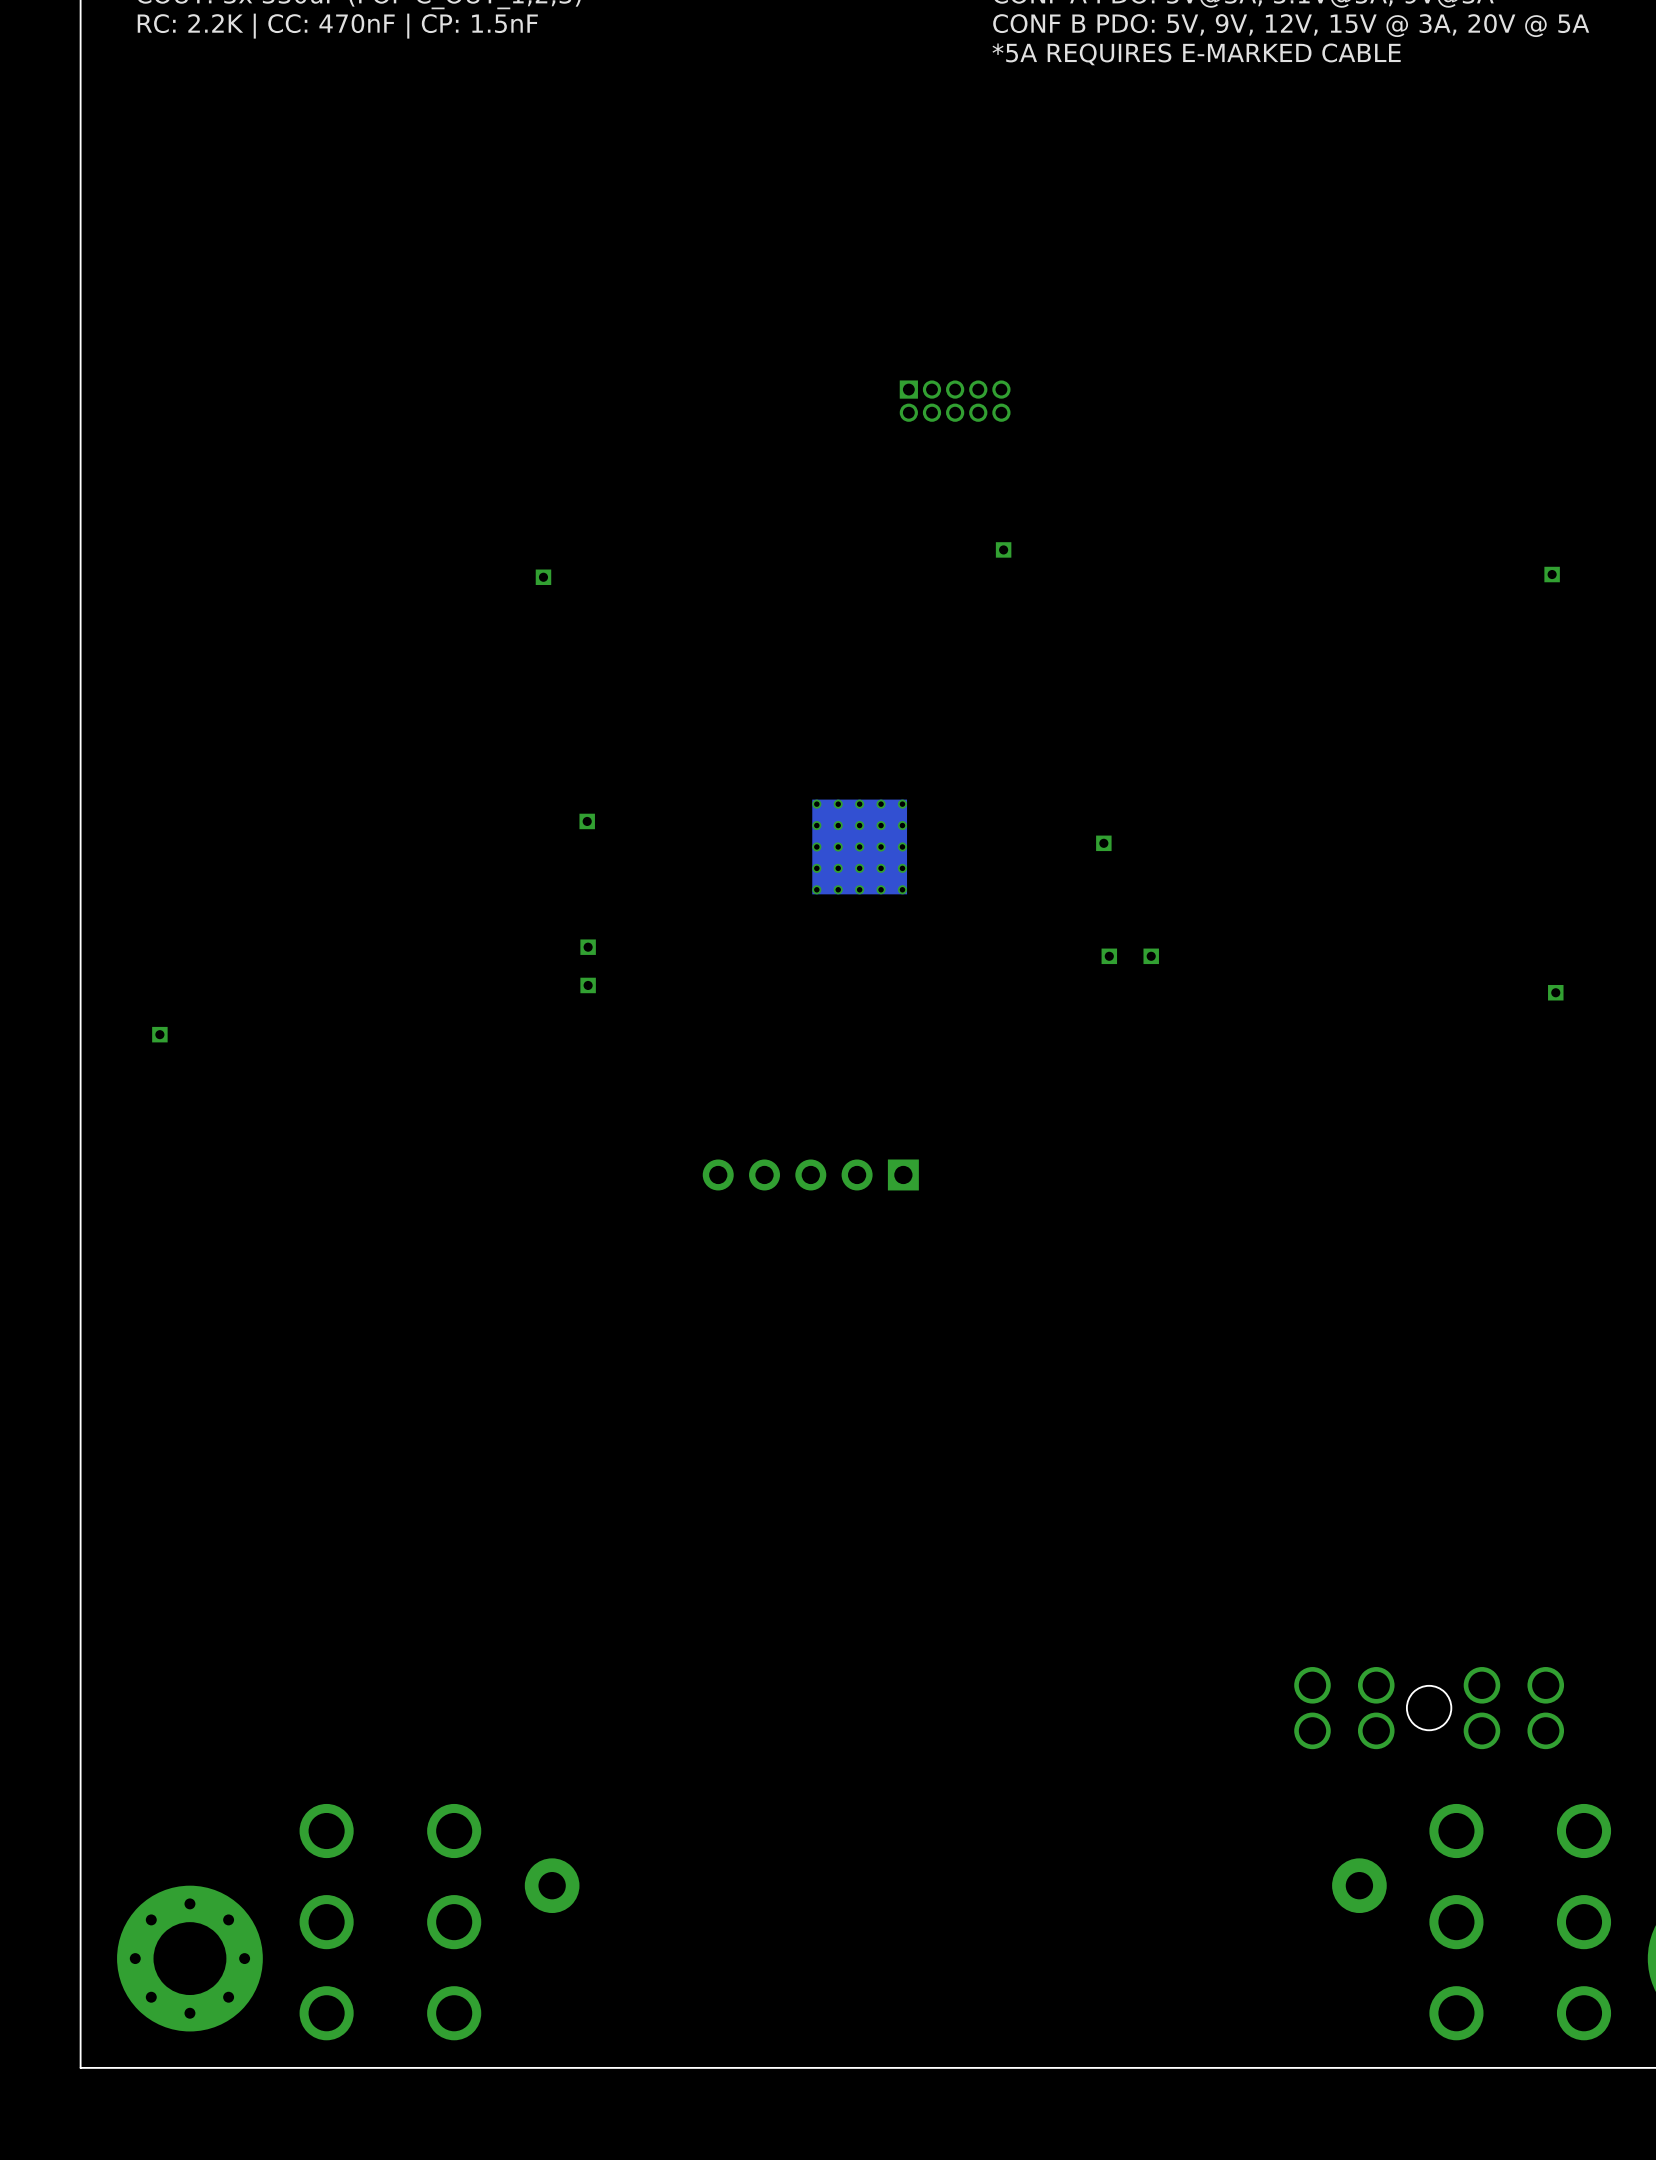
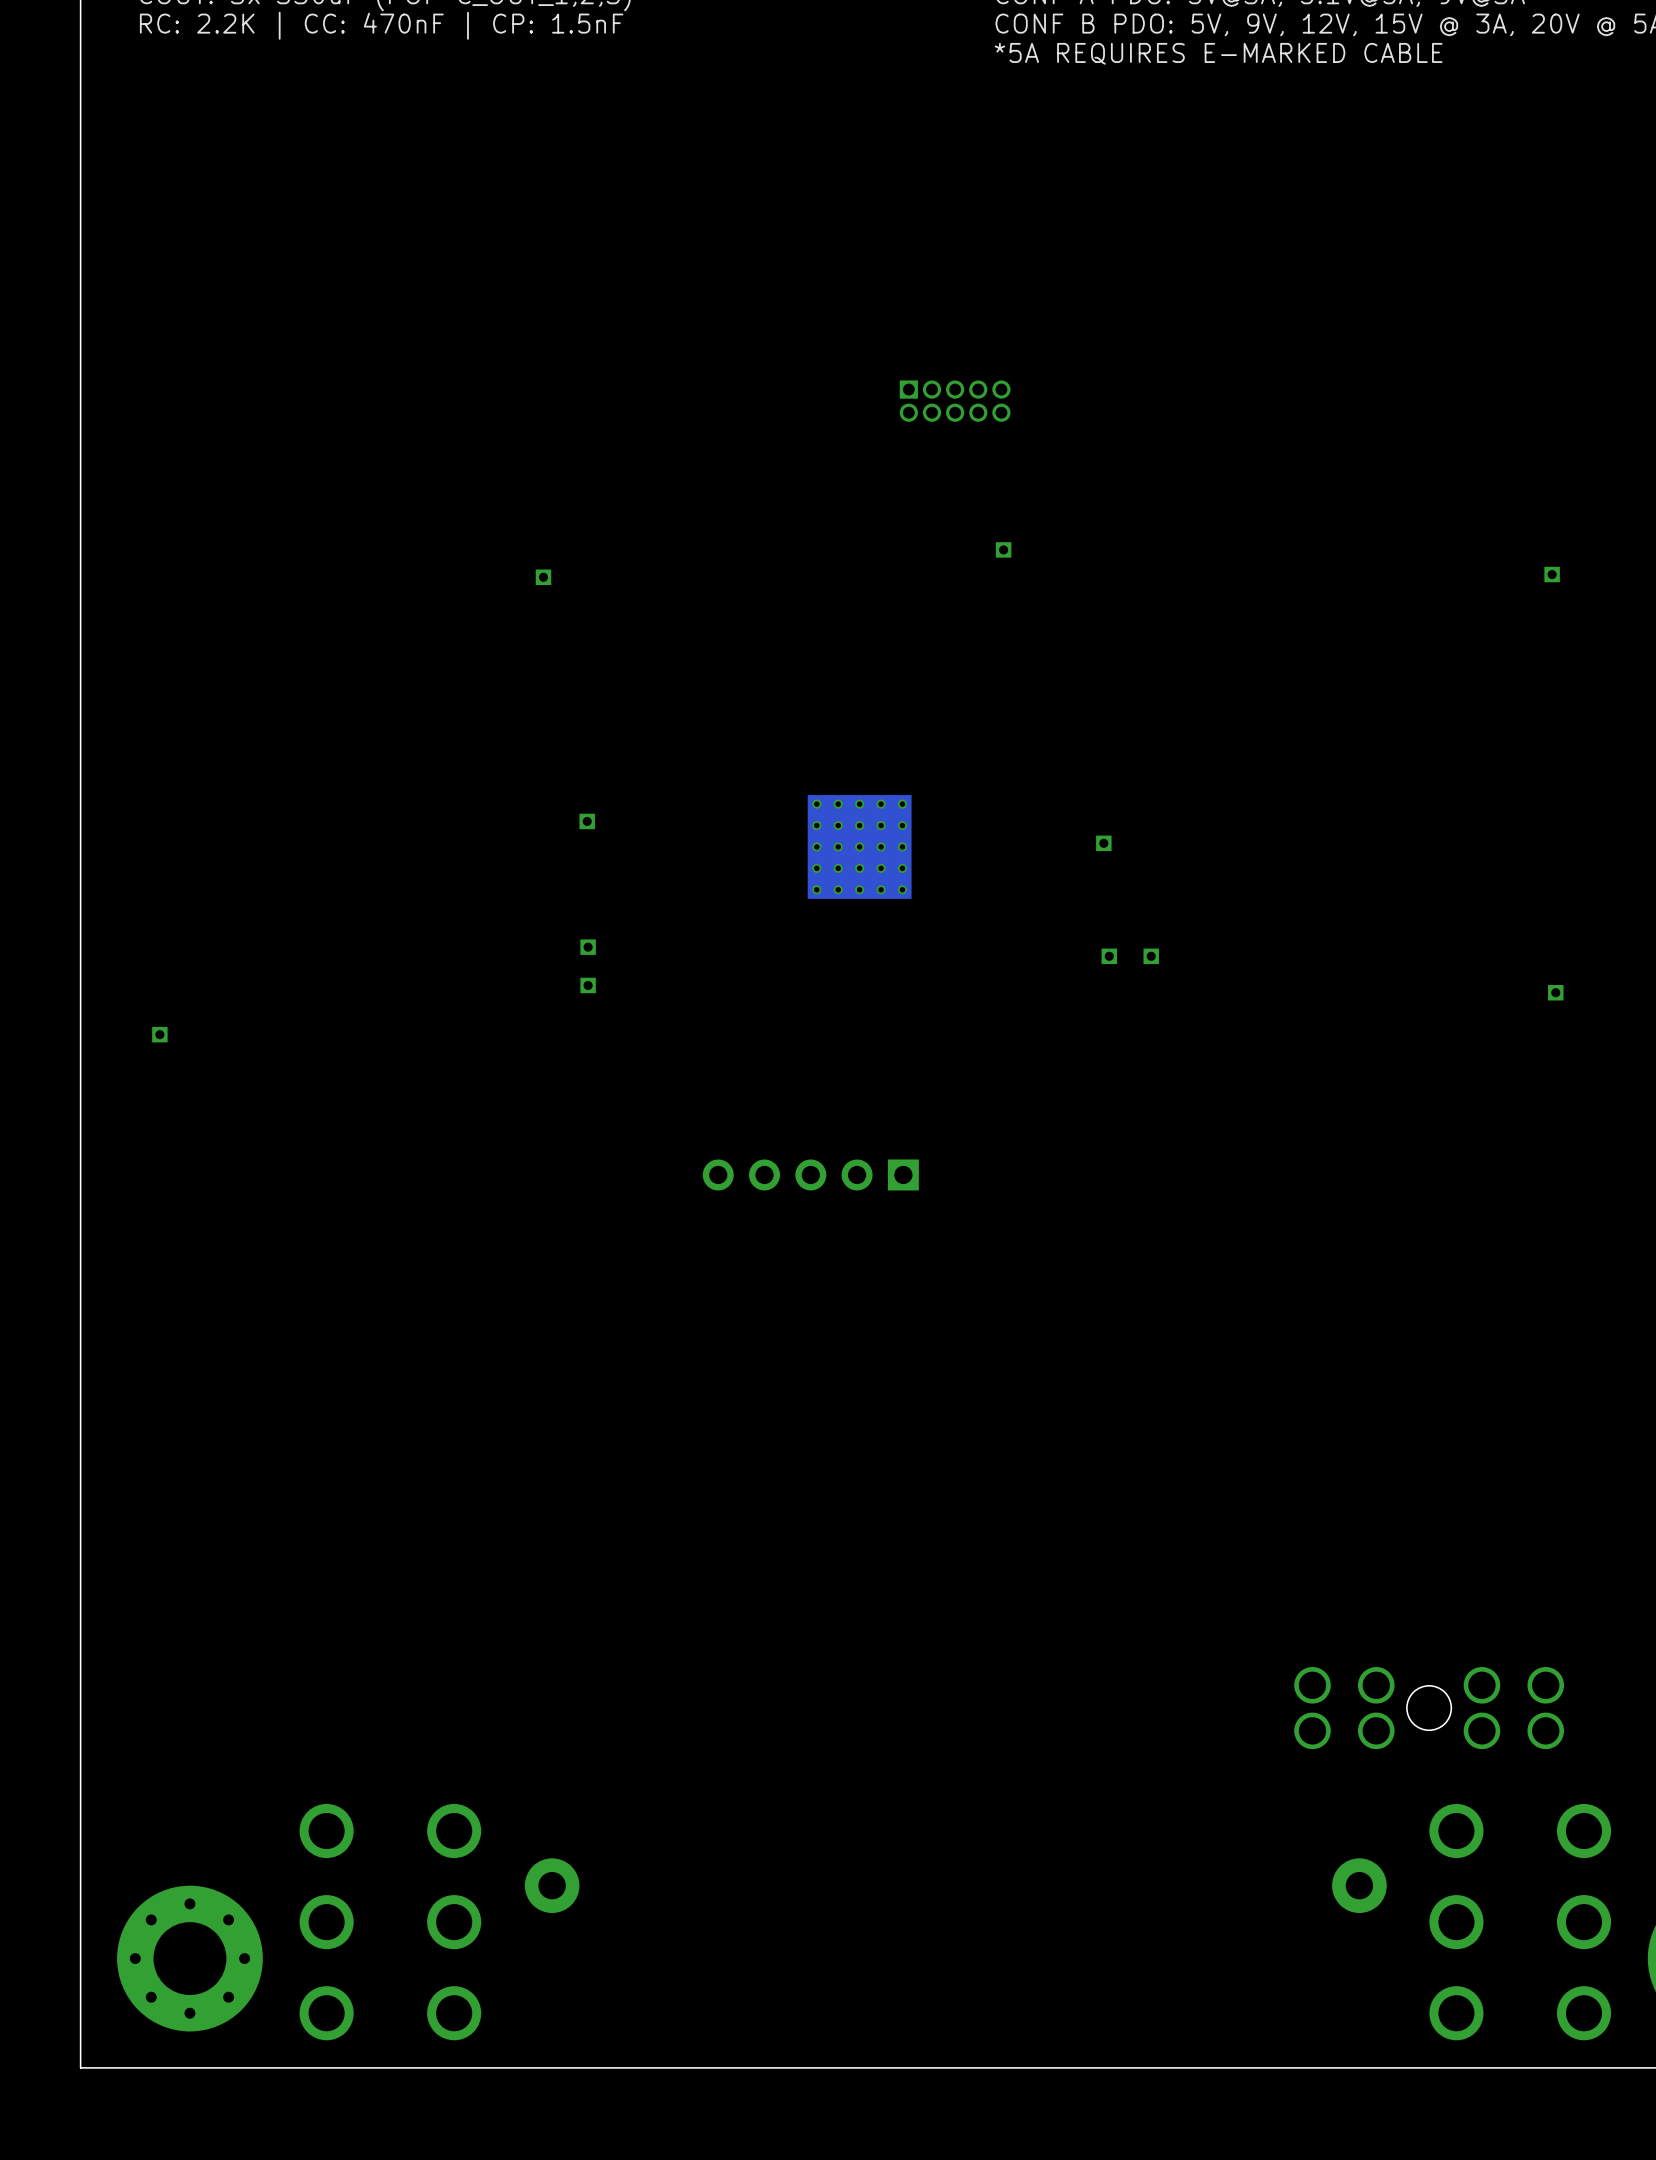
part footprint: [812, 799, 908, 895] -> [807, 795, 912, 899]

